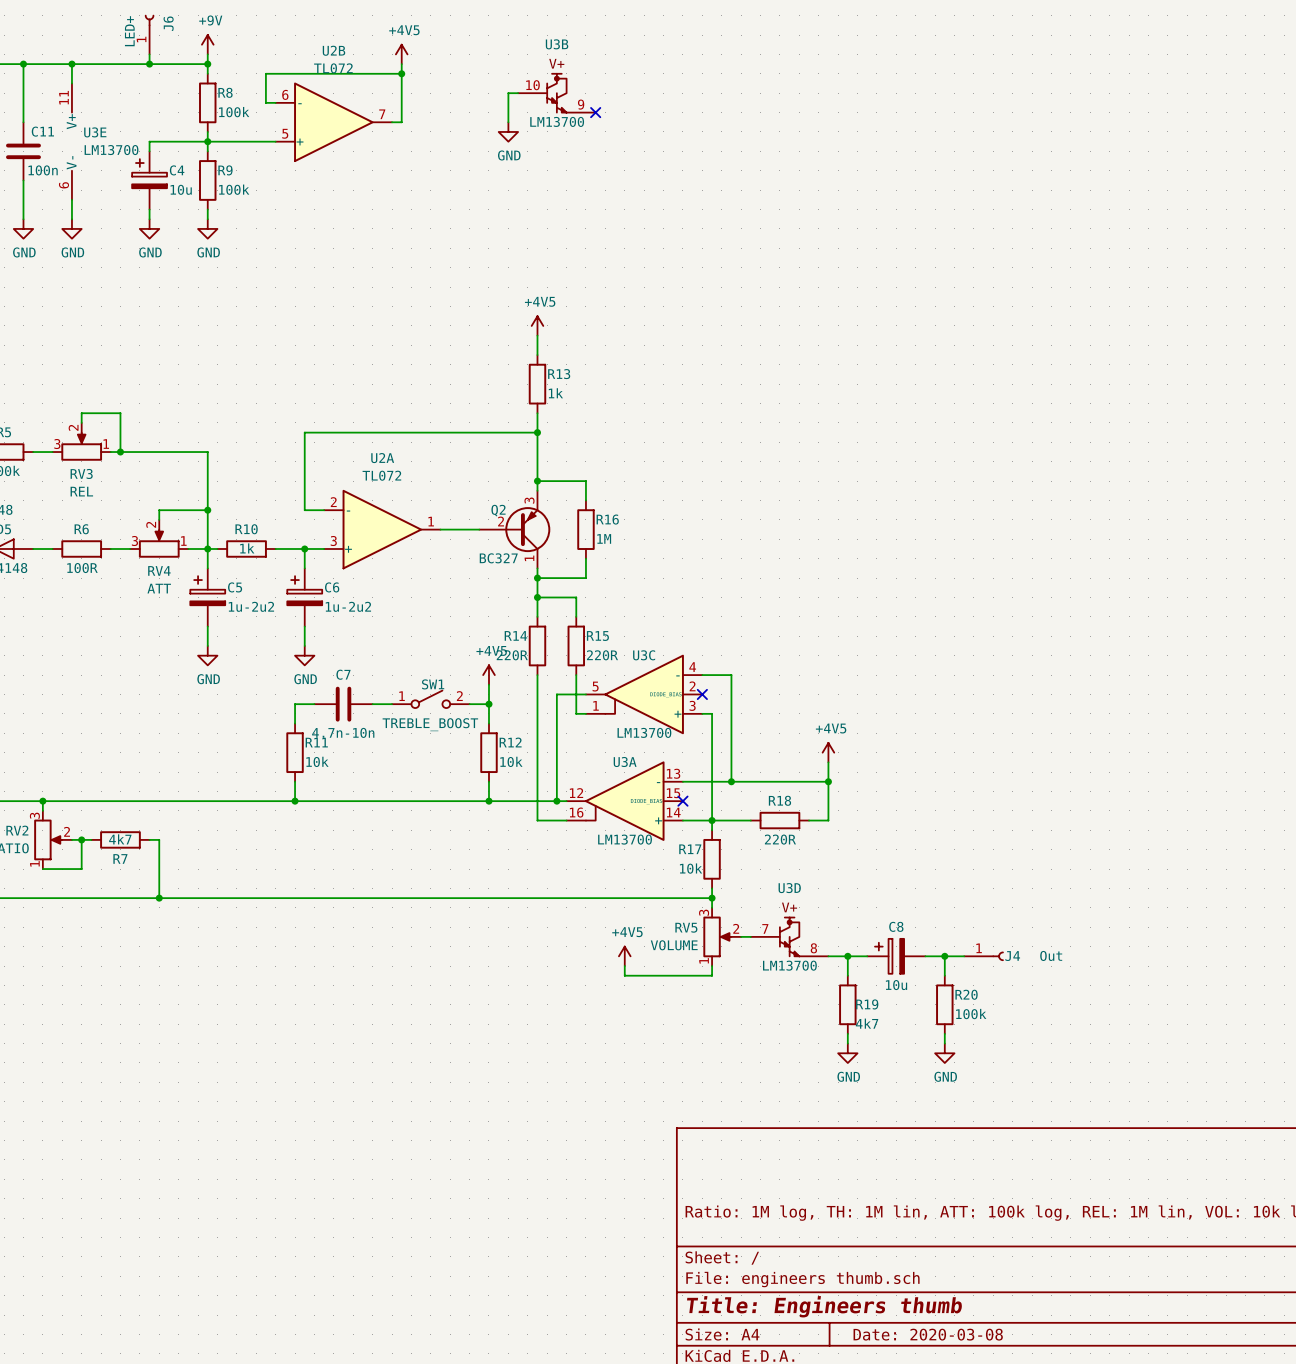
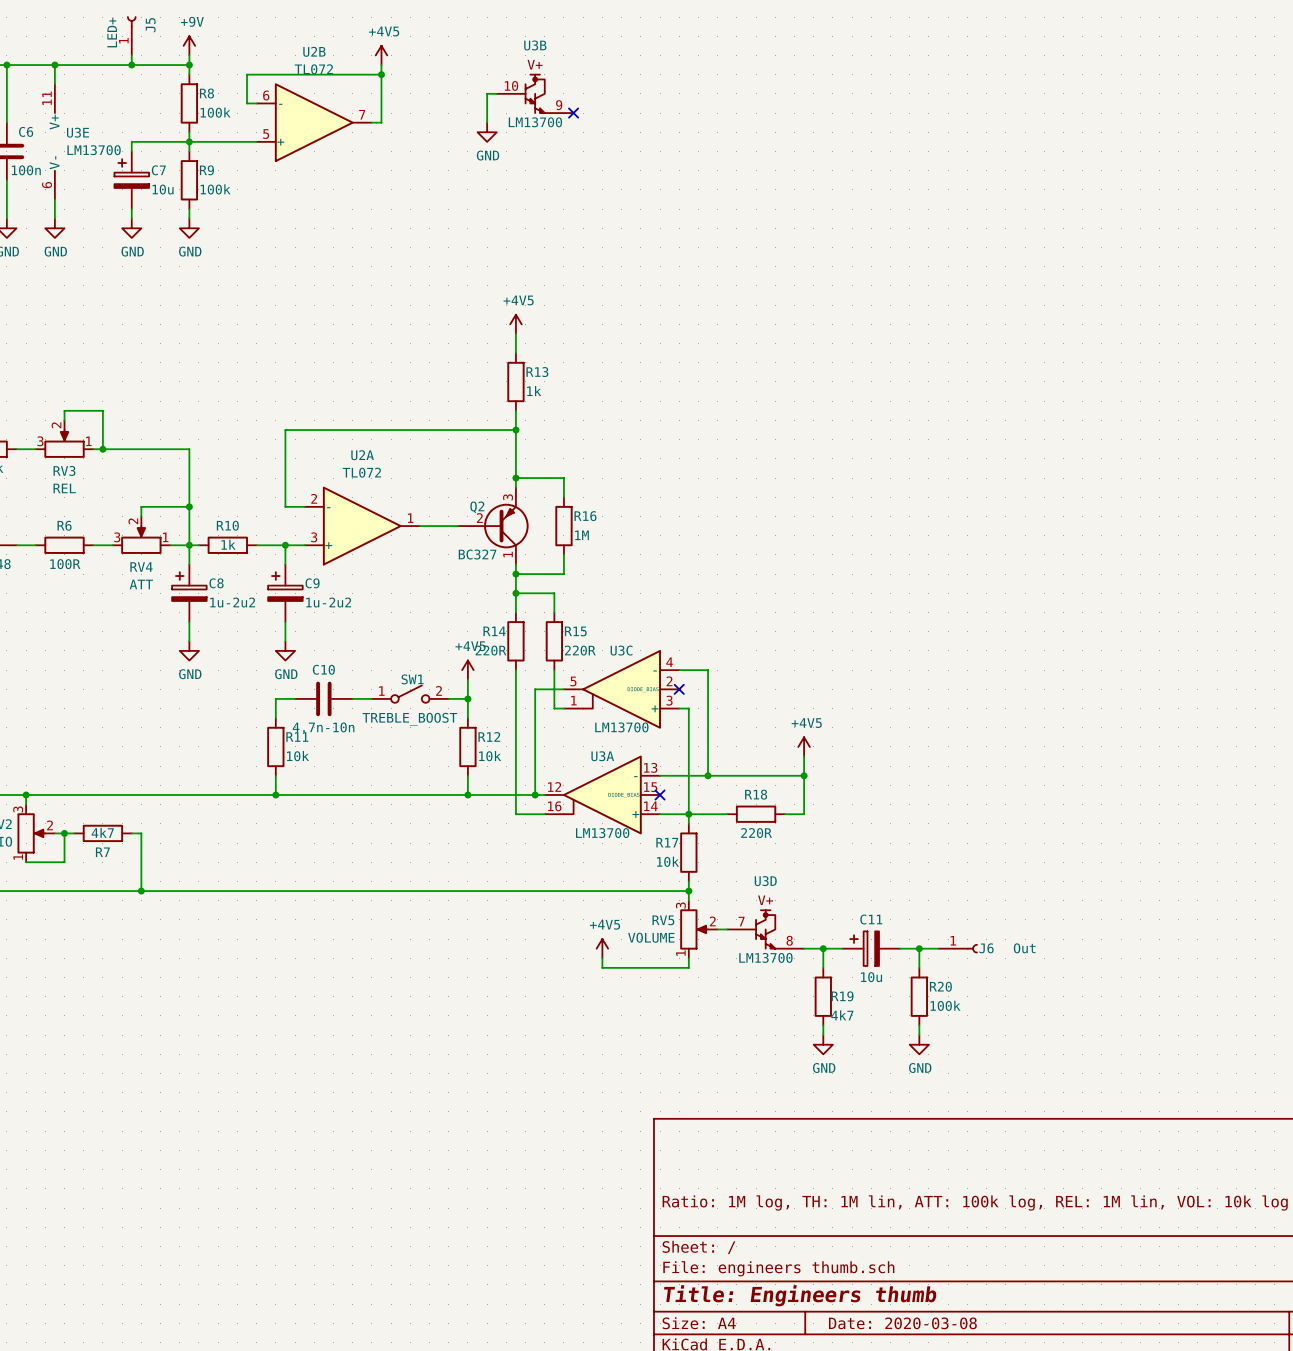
J6 name: J6 (168, 23) -> J5 (150, 25)
C11 name: C11 (42, 131) -> C6 (26, 131)
C4 name: C4 (177, 170) -> C7 (158, 170)
C5 name: C5 (235, 587) -> C8 (216, 583)
C6 name: C6 (332, 587) -> C9 (312, 583)
C7 name: C7 (343, 674) -> C10 (323, 669)
C8 name: C8 (896, 926) -> C11 (871, 919)
J4 name: J4 (1012, 956) -> J6 (986, 948)

